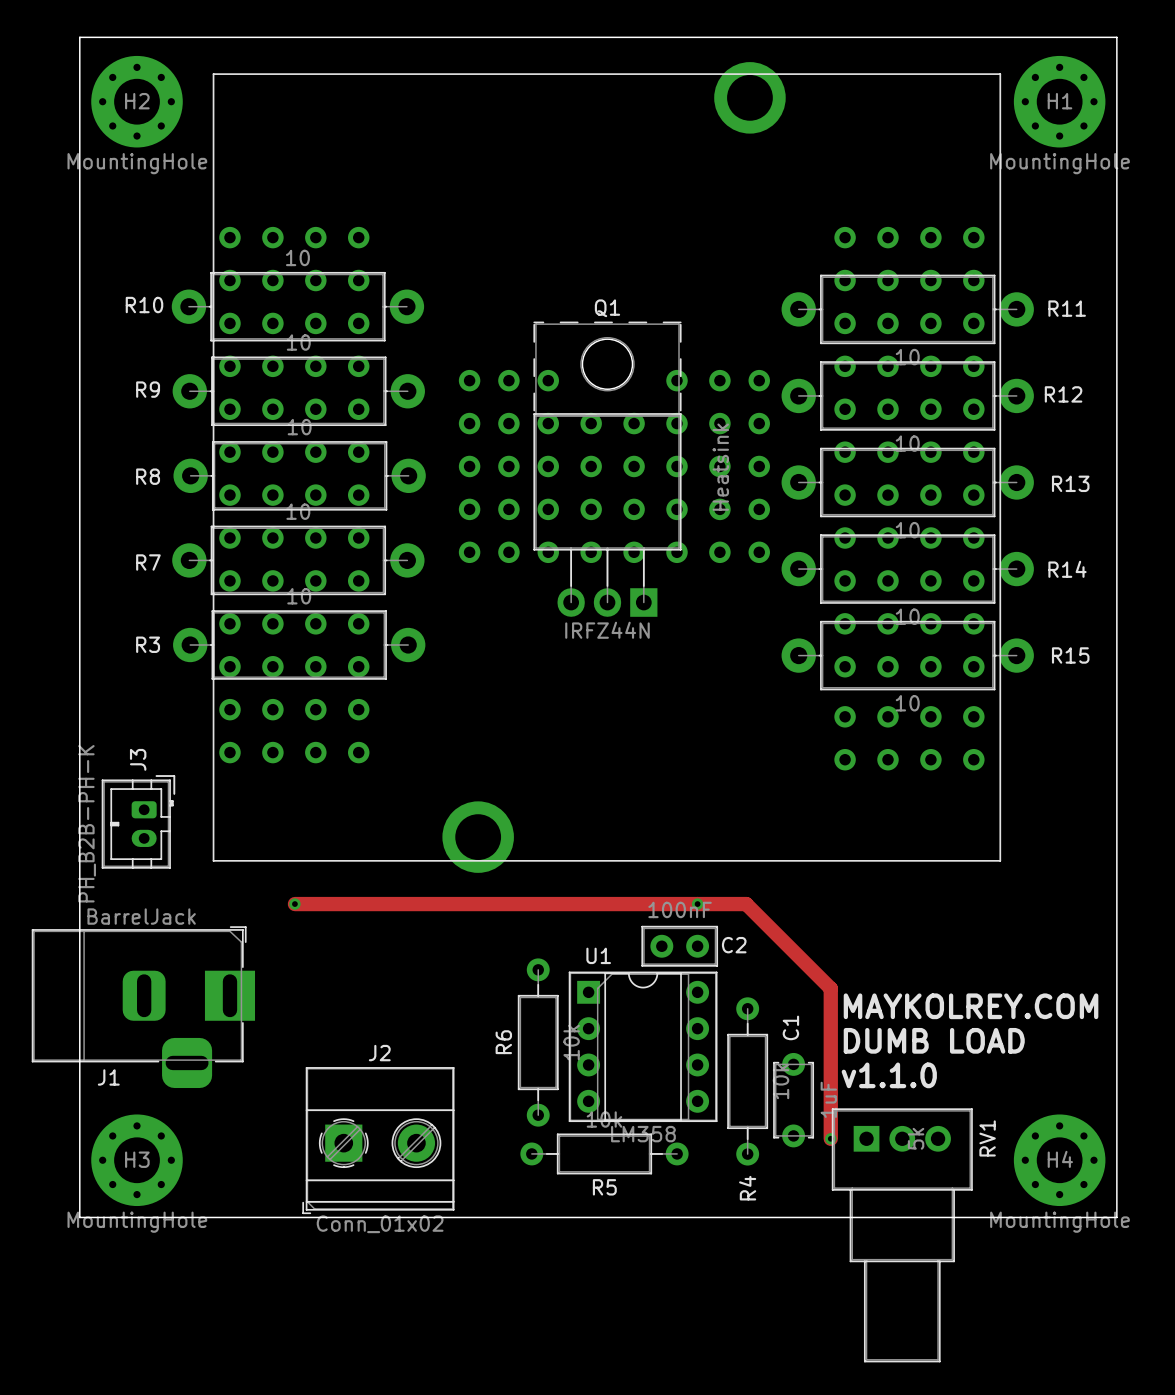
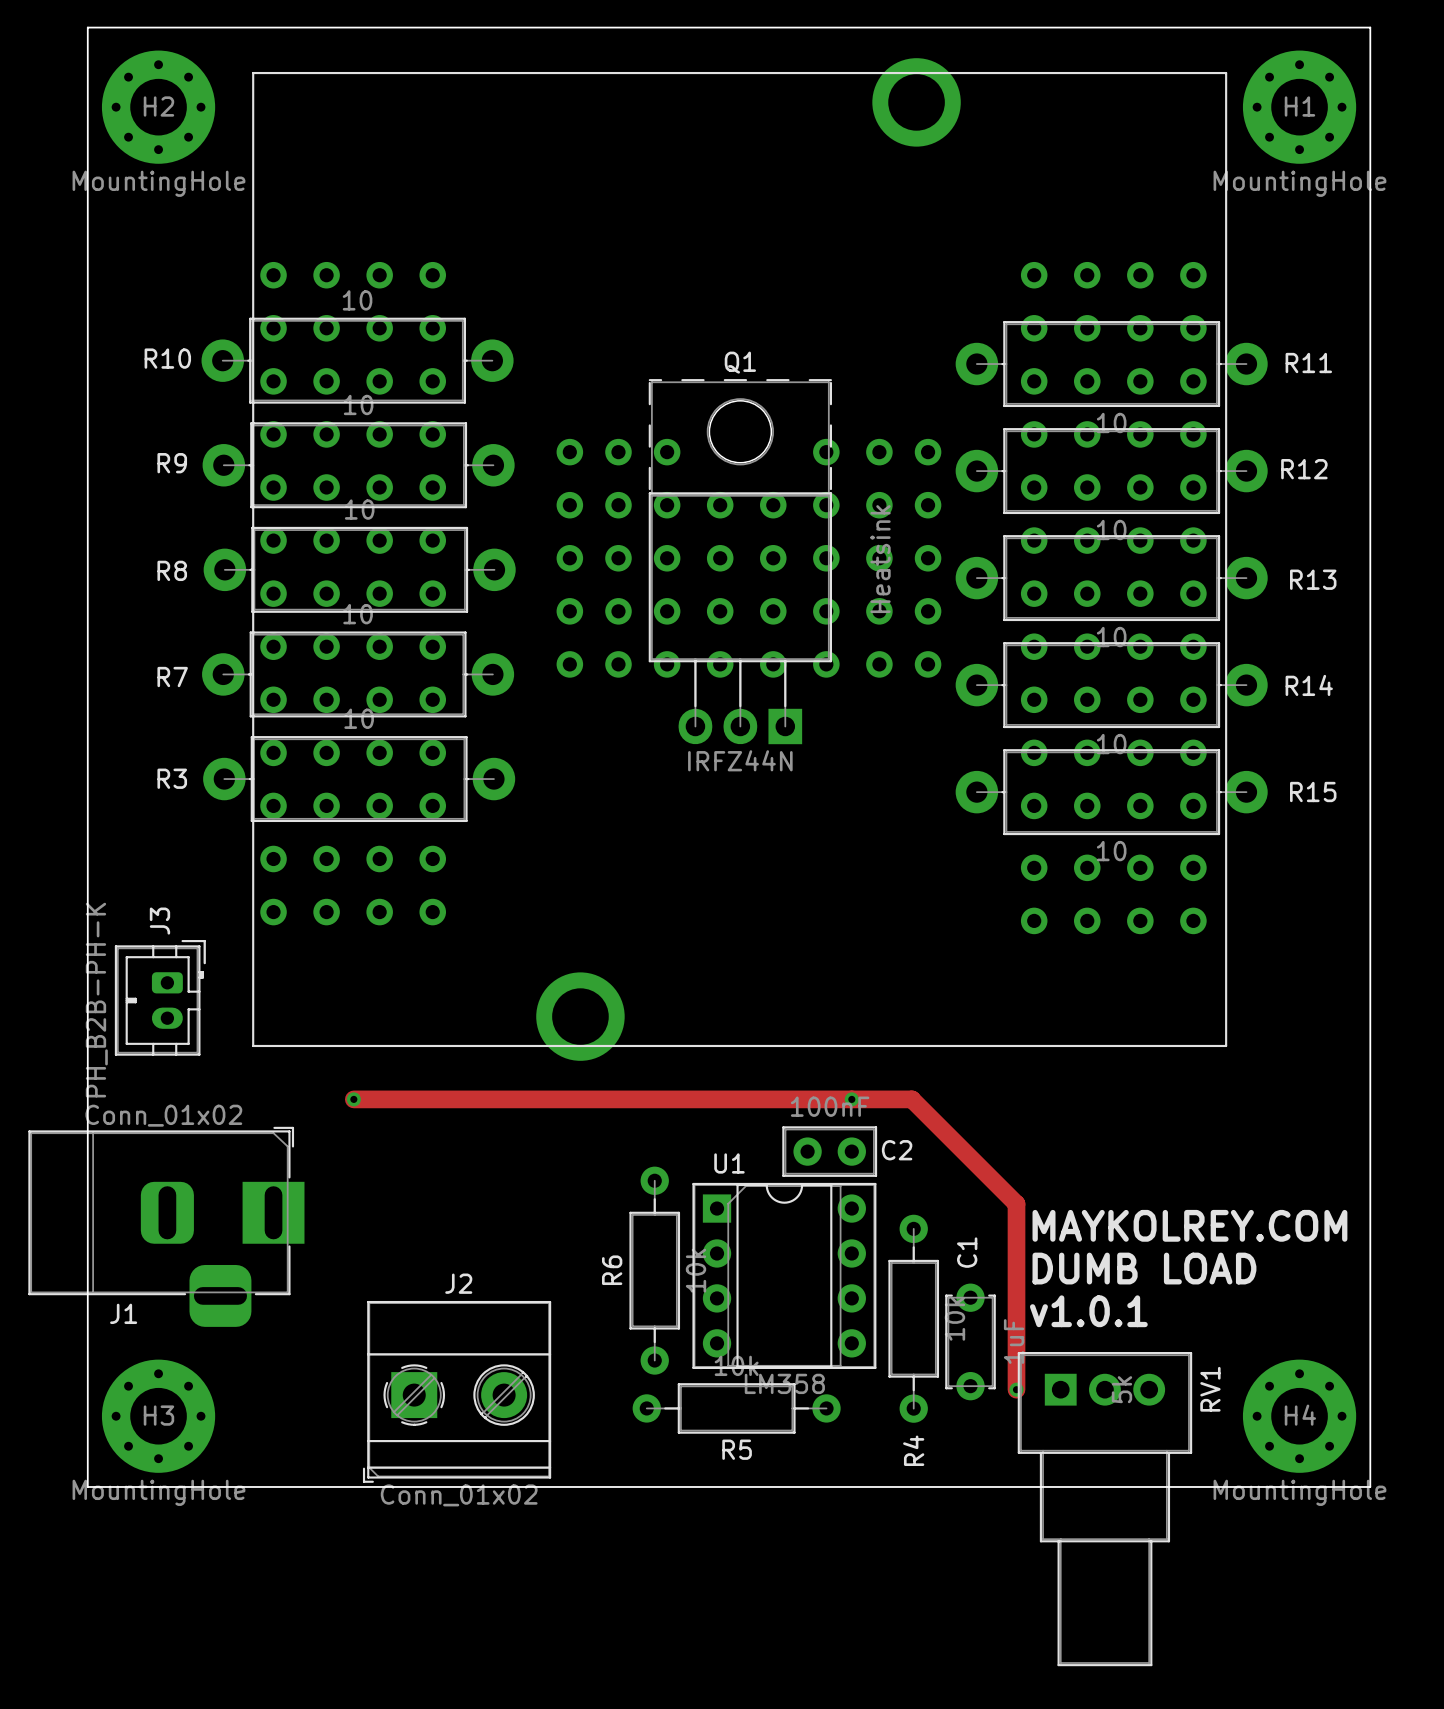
J1 value: BarrelJack (141, 916) -> Conn_01x02 (163, 1115)
text: v1.1.0 (889, 1075) -> v1.0.1 (1088, 1311)

